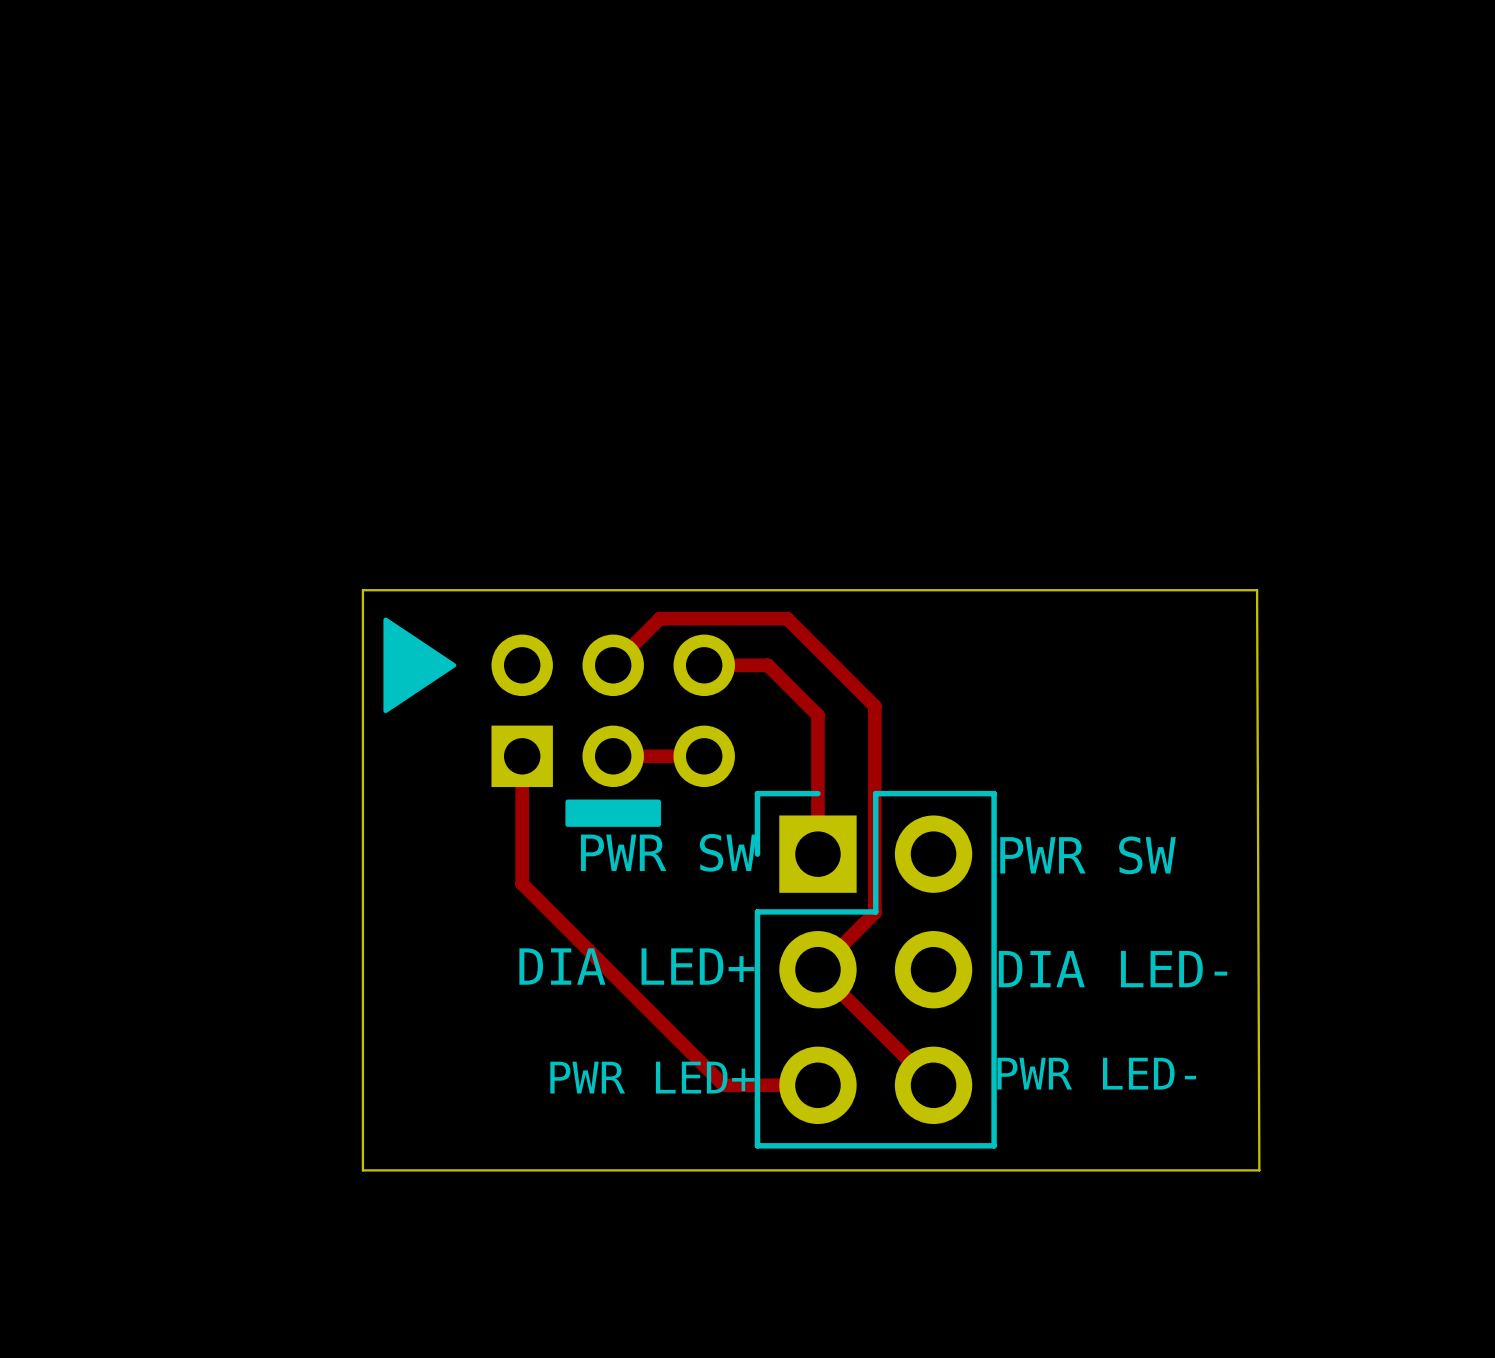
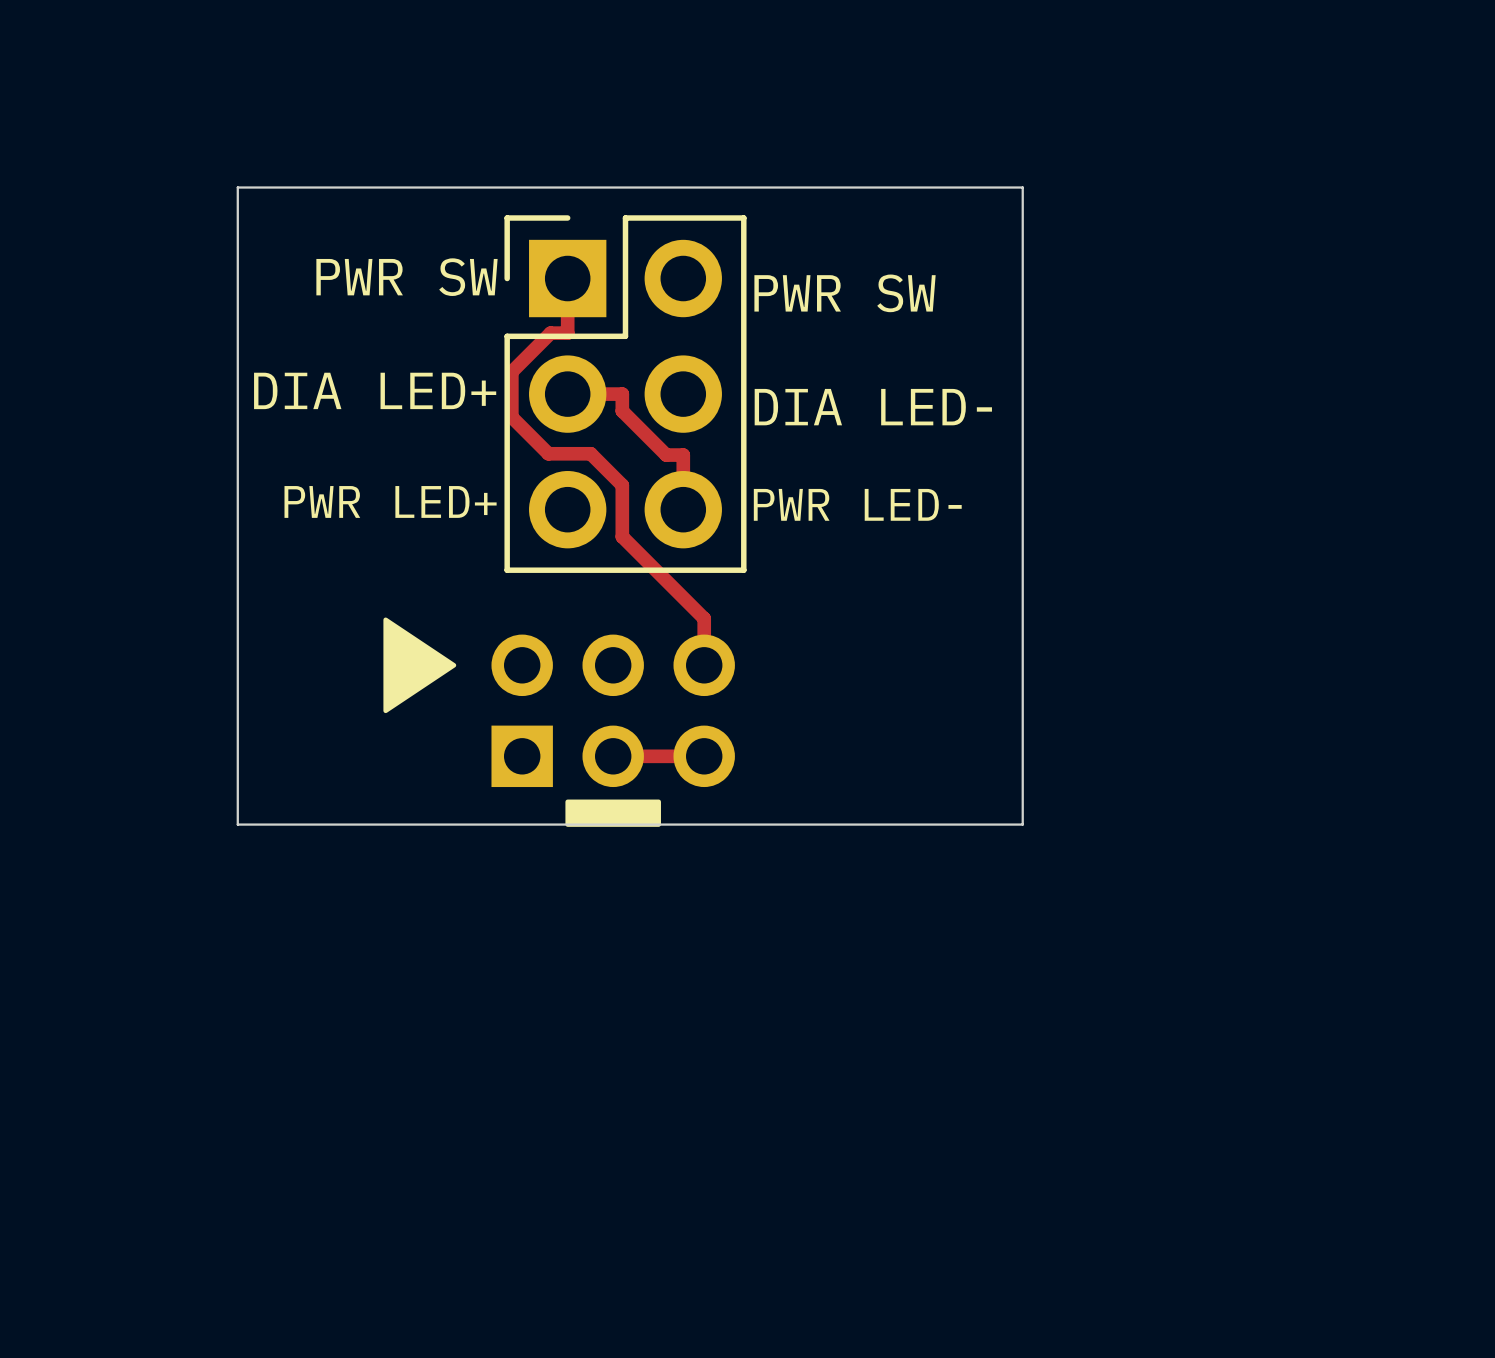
board edge: none -> (237, 187) (237, 824) (1022, 824) (1022, 187) (237, 187)
text: none -> PWR SW (407, 277)
text: none -> PWR SW (845, 293)
track: none -> (567, 394) (622, 394) (622, 411) (666, 455) (683, 455) (683, 509)
board edge: (362, 590) (362, 1170) (1259, 1170) (1257, 590) (362, 590) -> none
track: (613, 665) (659, 618) (787, 618) (874, 706) (874, 912) (817, 969) (933, 1085) -> none
track: (704, 665) (767, 665) (817, 715) (817, 854) -> (704, 665) (704, 618) (622, 536) (622, 485) (590, 453) (548, 453) (511, 417) (511, 371) (550, 333) (567, 333) (567, 278)
track: (522, 756) (522, 883) (723, 1085) (817, 1085) -> none
text: PWR SW (668, 852) -> none
text: PWR SW (1088, 855) -> none
text position: DIA LED+ (636, 966) -> DIA LED+ (375, 390)
part position: (875, 969) -> (625, 394)
text position: DIA LED- (1113, 969) -> DIA LED- (873, 407)
text position: PWR LED- (1096, 1073) -> PWR LED- (857, 504)
text position: PWR LED+ (652, 1077) -> PWR LED+ (390, 501)

